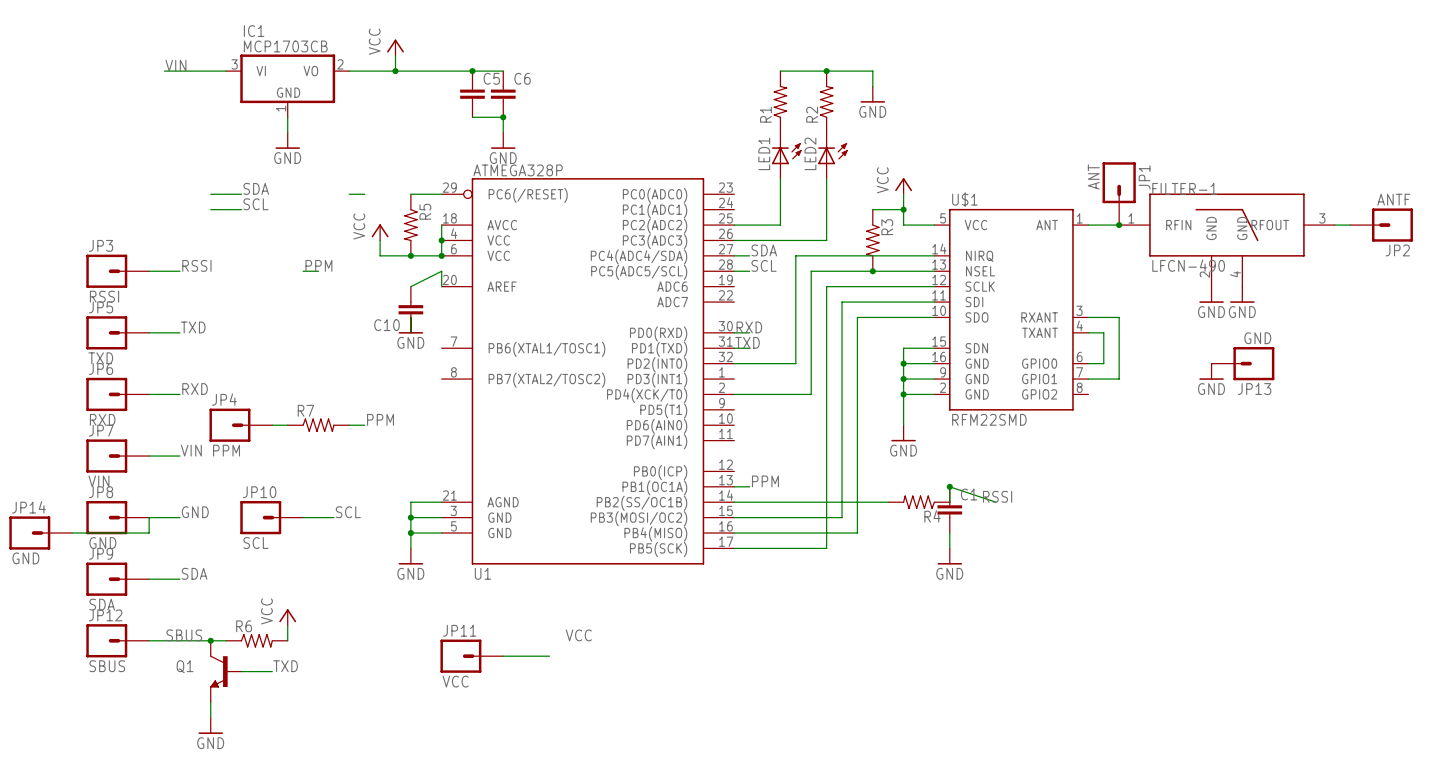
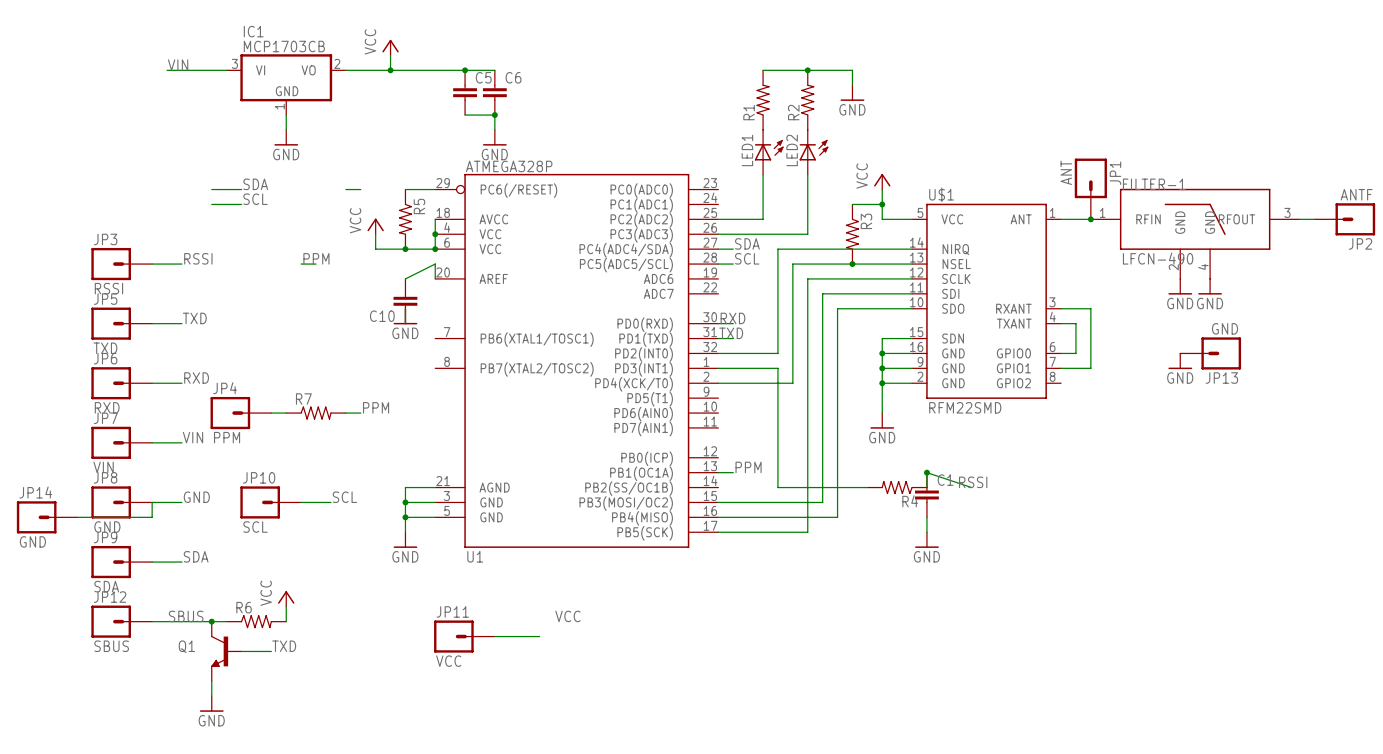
wire: (734, 502) (795, 502) -> (718, 368) (777, 368) (777, 487)

